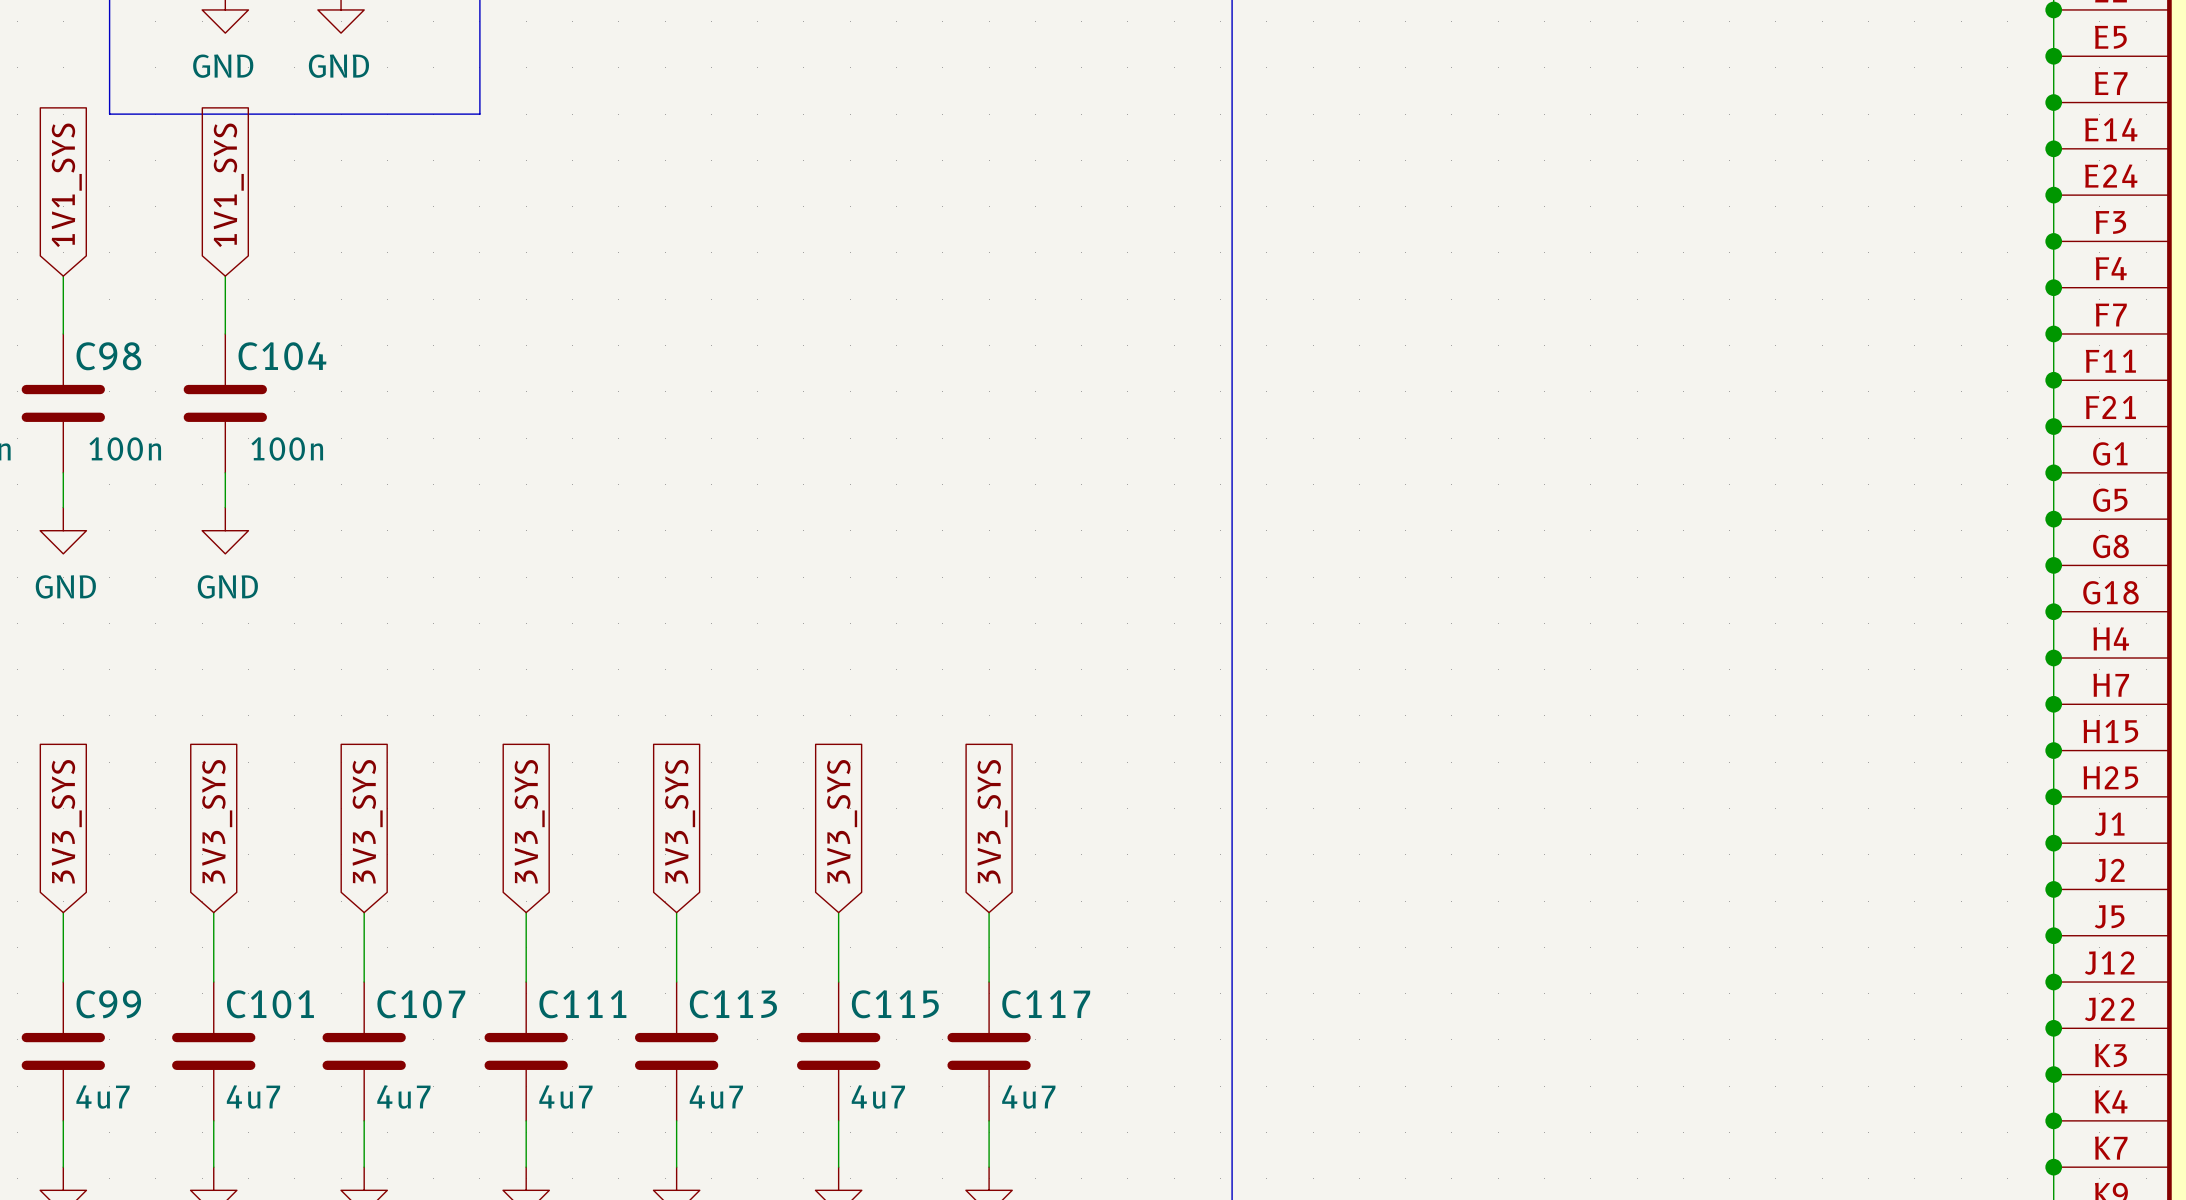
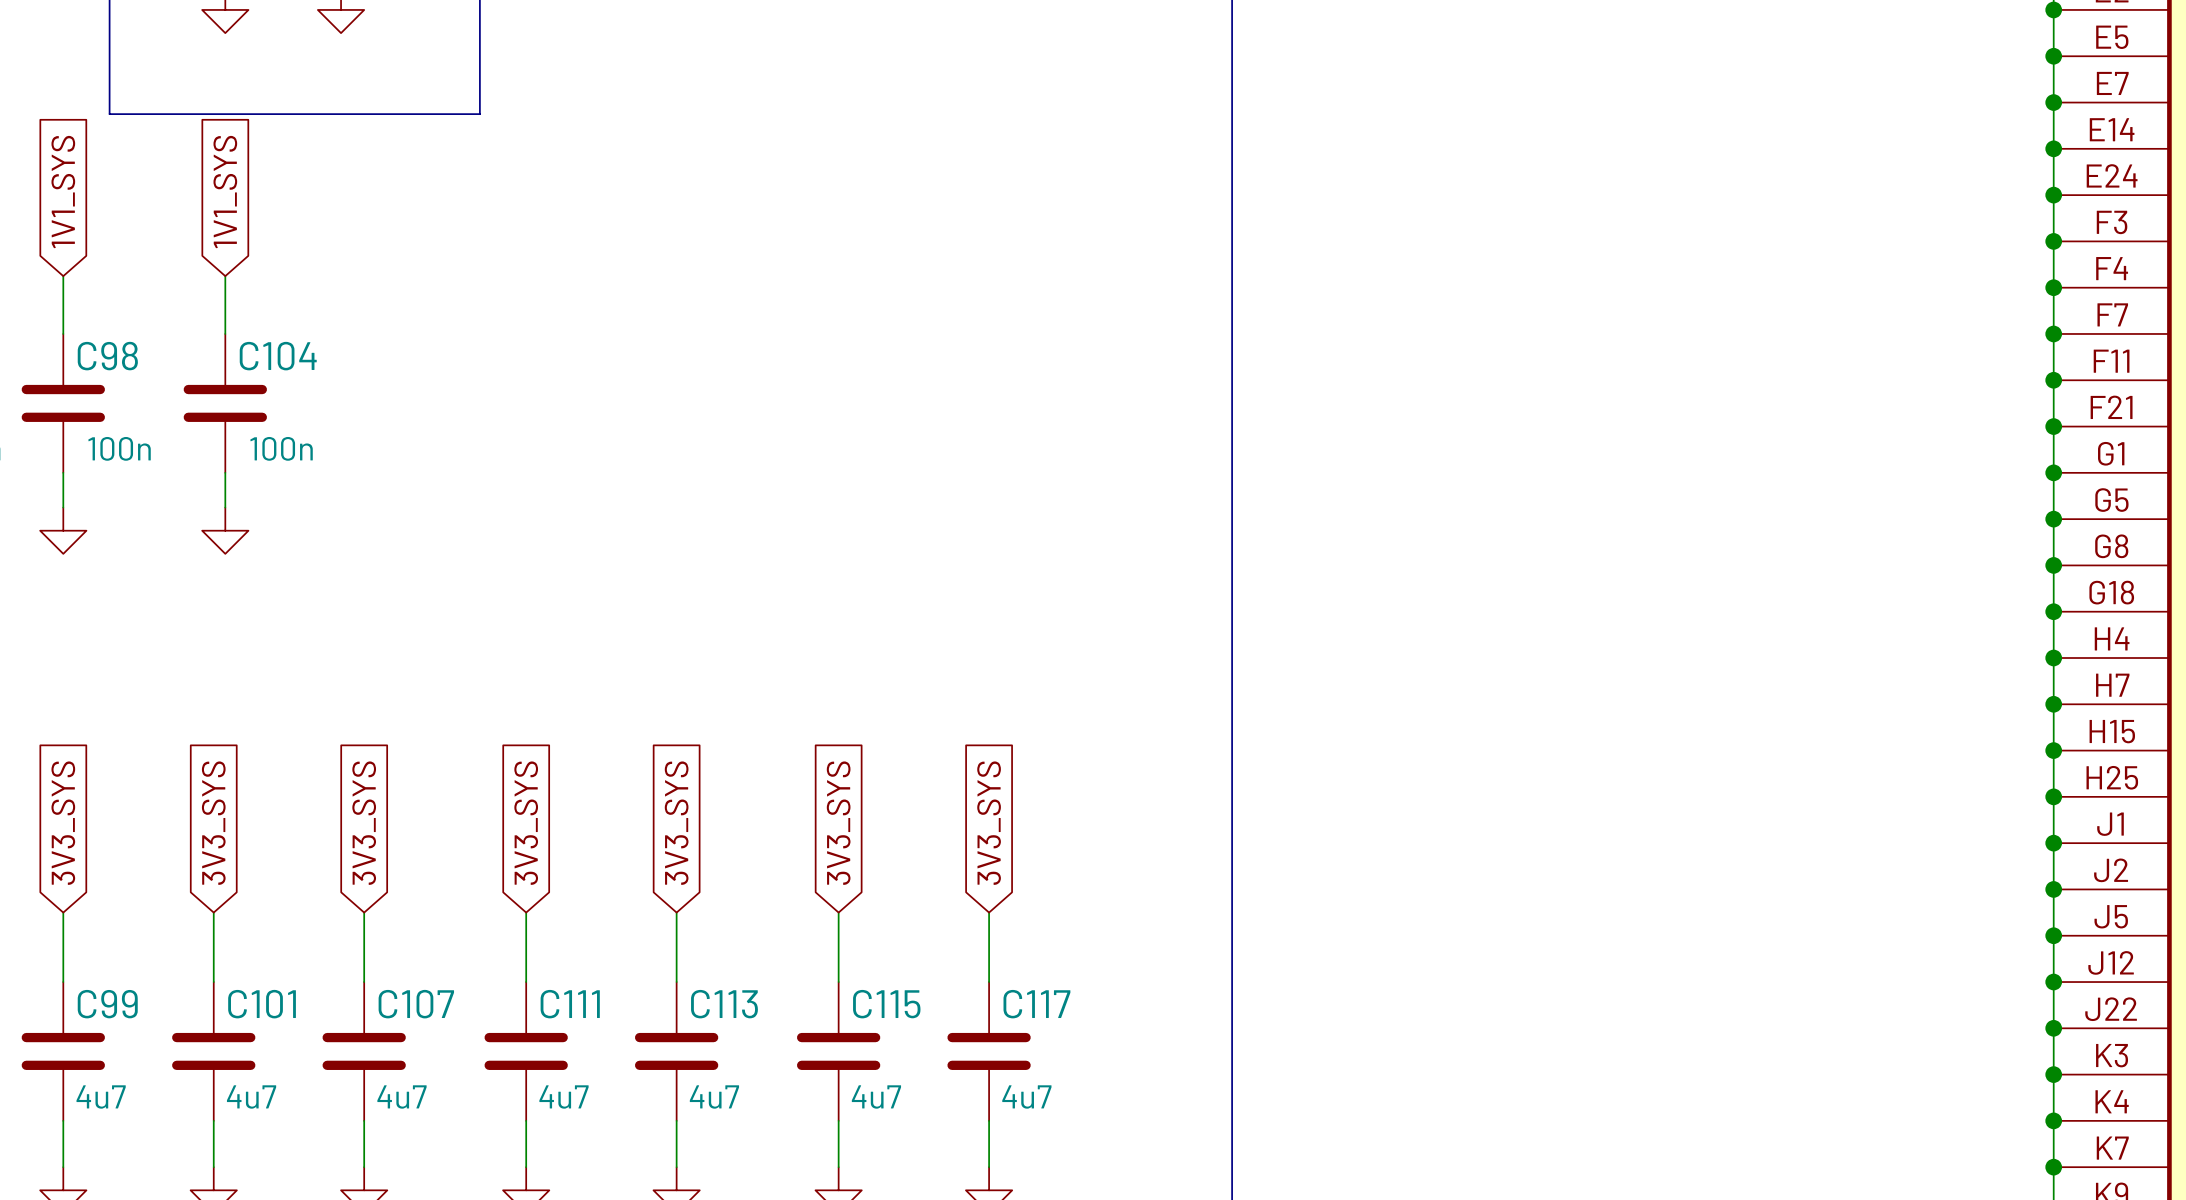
power symbol text: GND (223, 66) -> none
power symbol text: GND (338, 66) -> none
power symbol text: GND (65, 586) -> none
power symbol text: GND (227, 586) -> none

